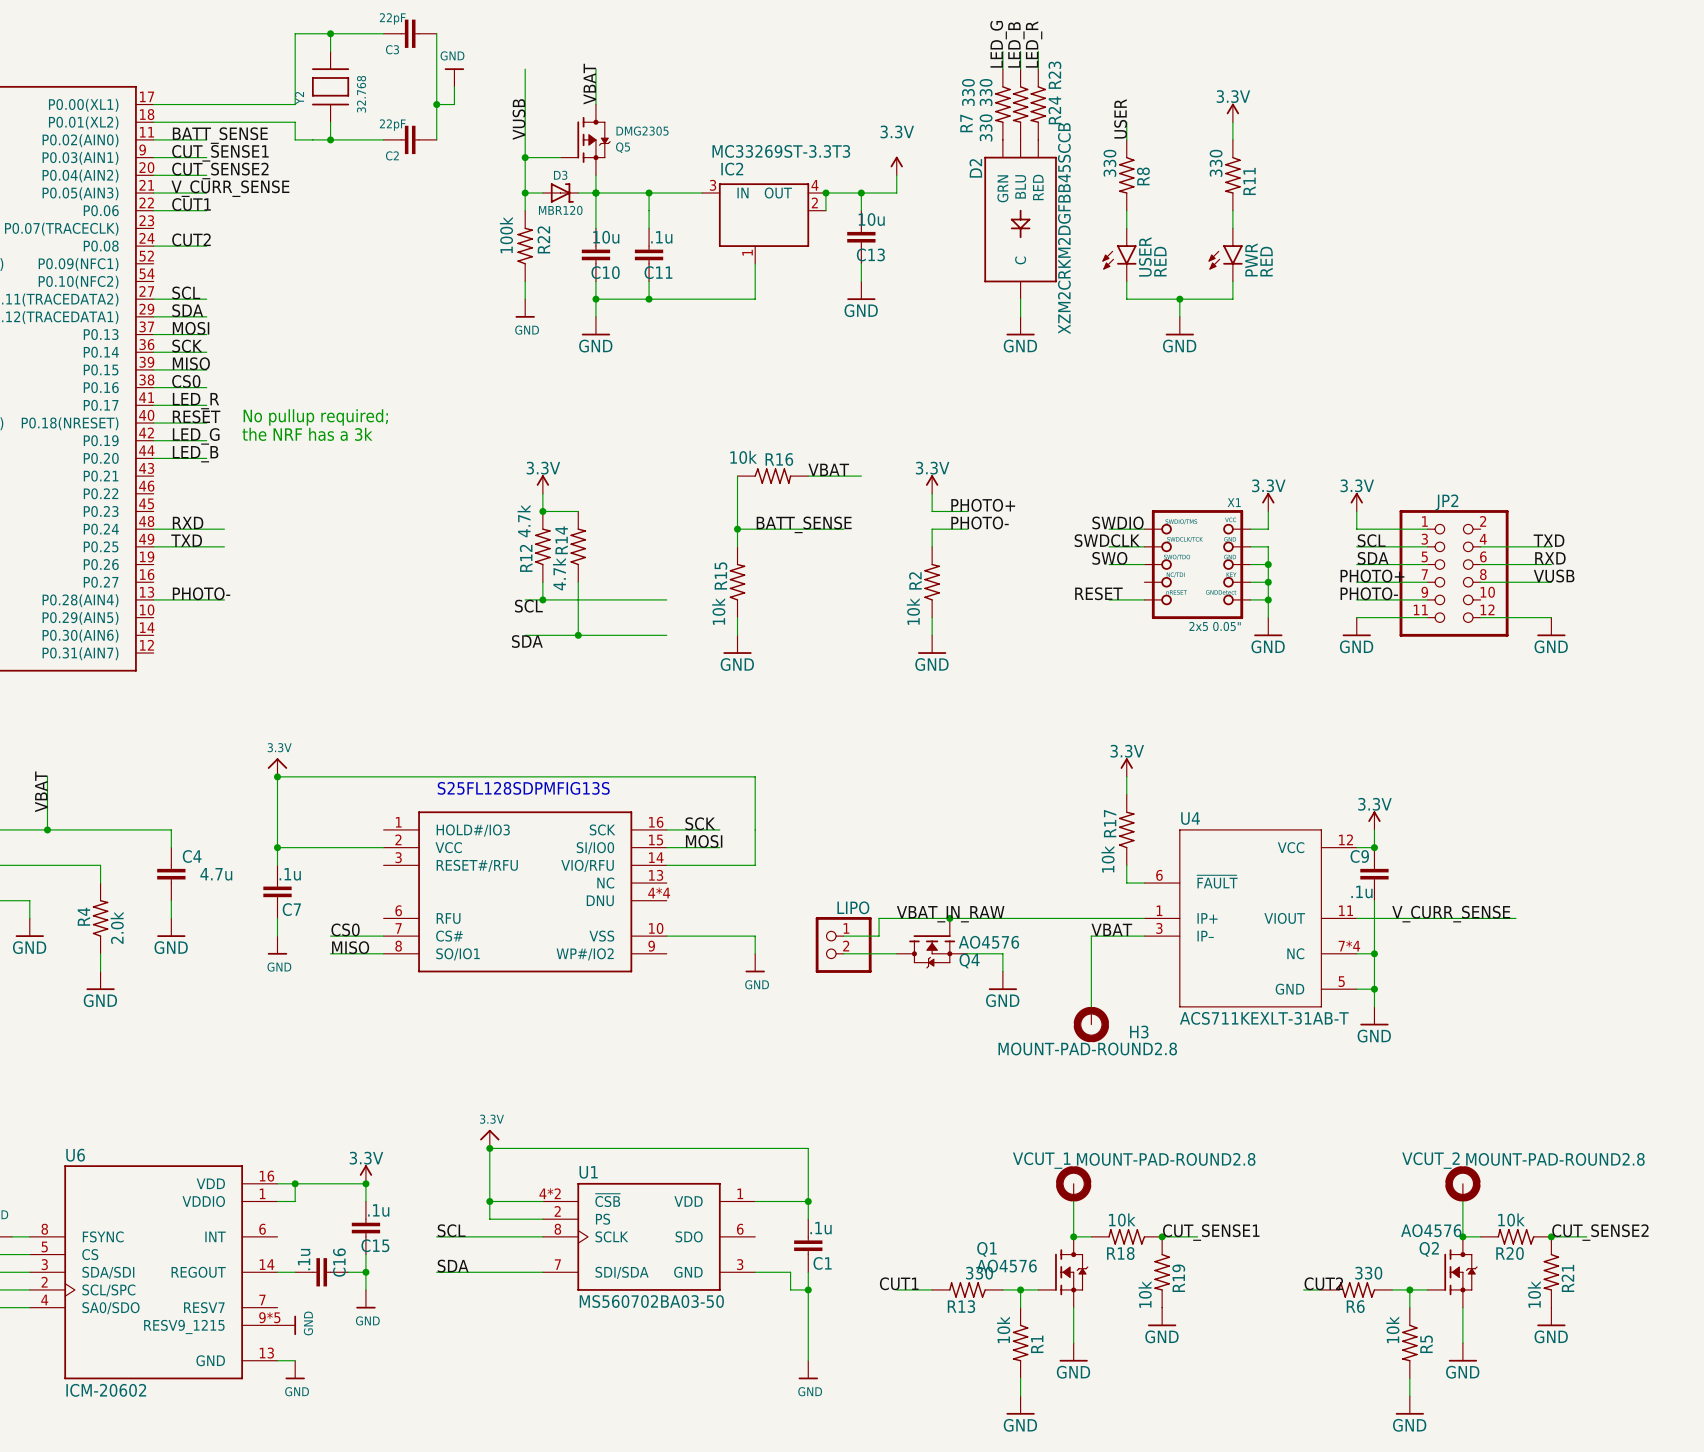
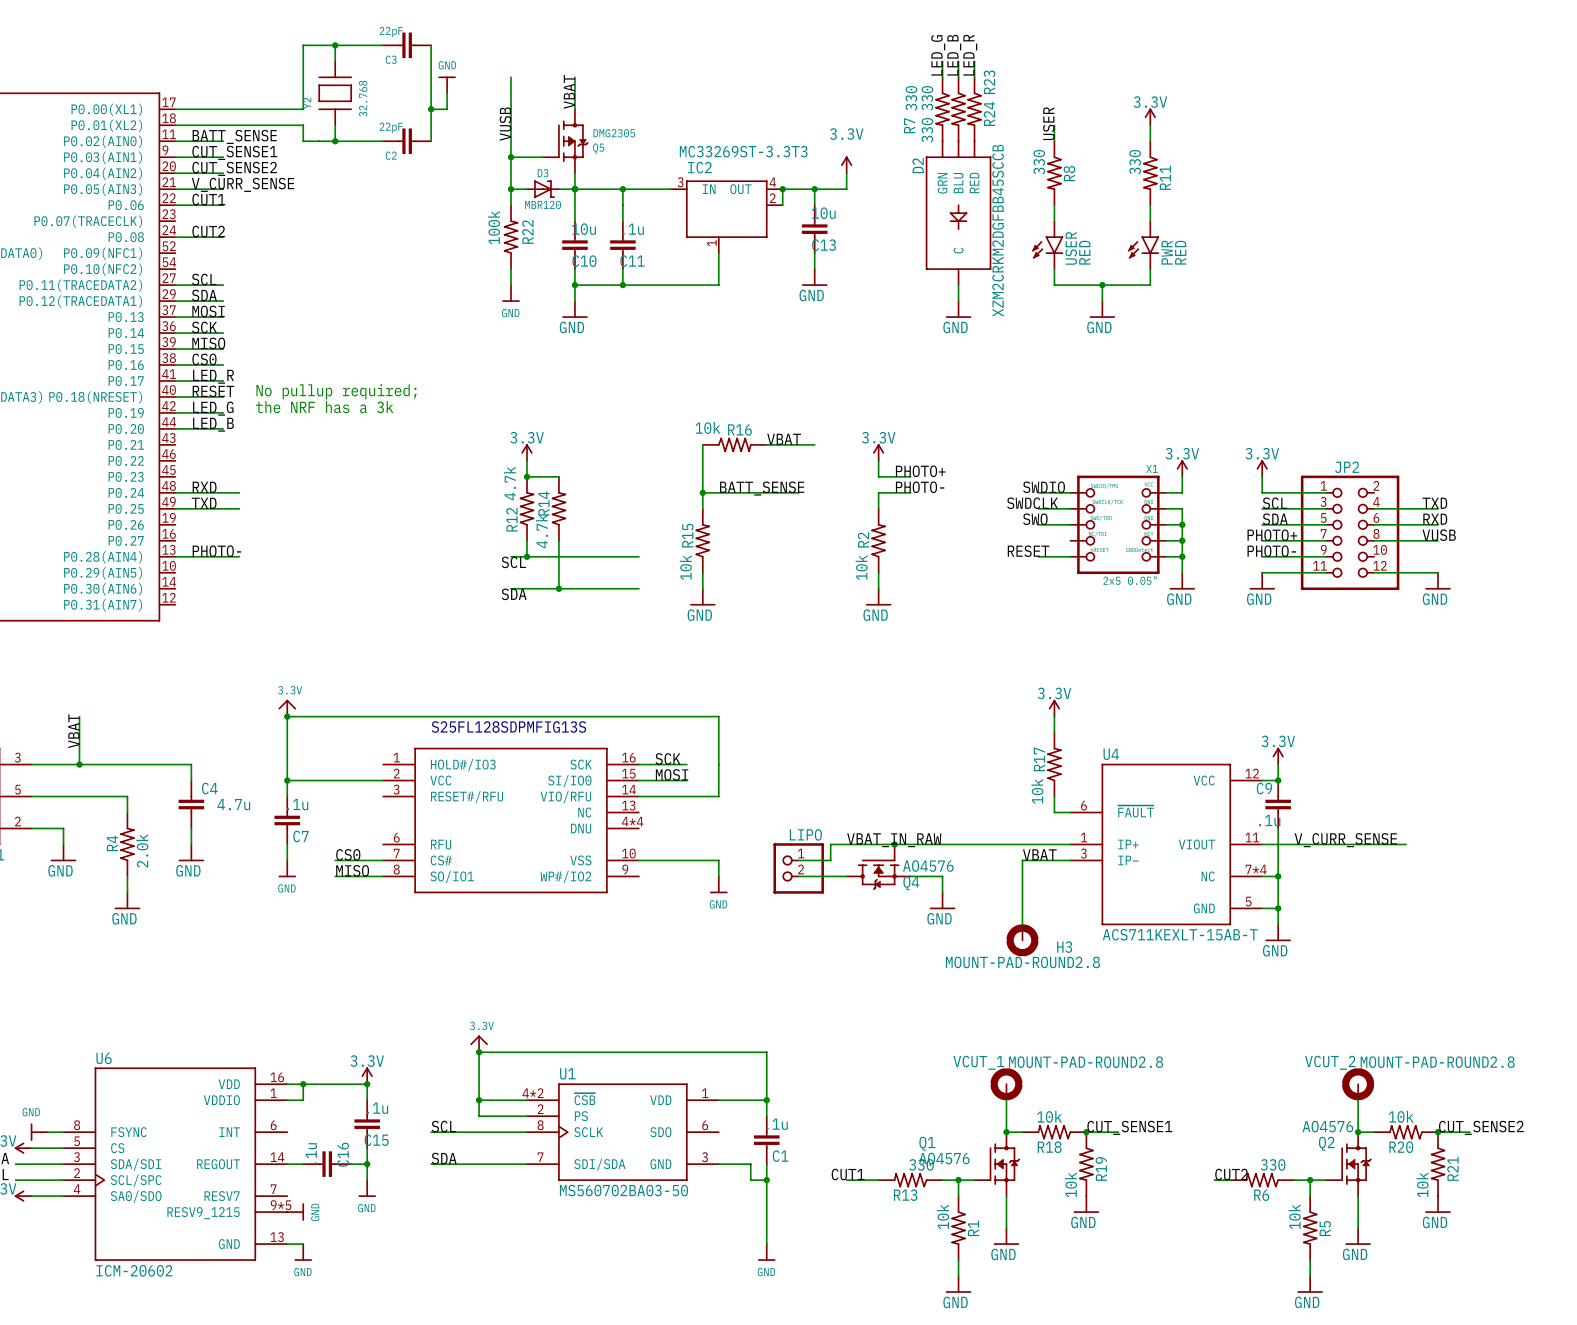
U4 value: ACS711KEXLT-31AB-T (1264, 1018) -> ACS711KEXLT-15AB-T (1180, 934)

